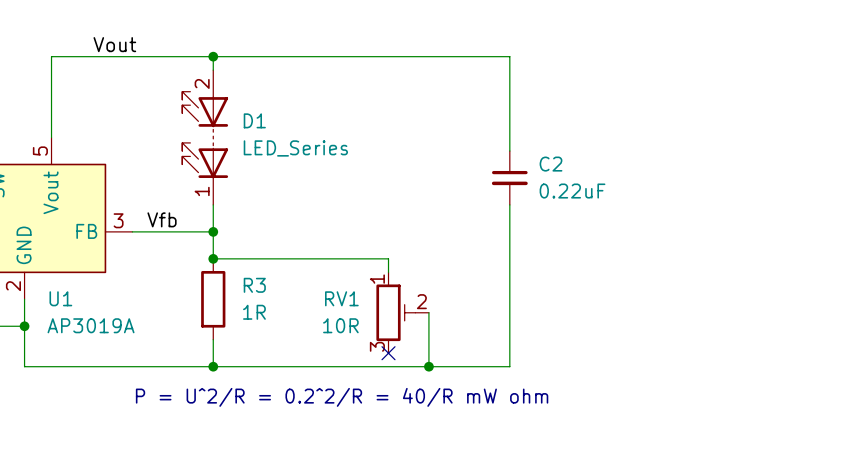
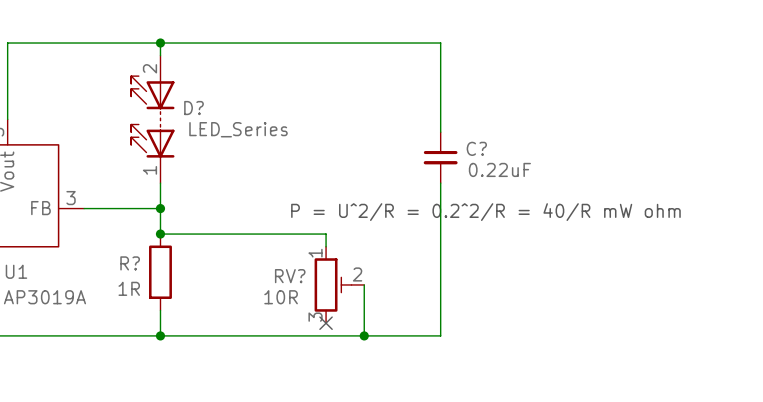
label: Vout (114, 44) -> none
D1 name: D1 (254, 120) -> D? (193, 108)
C2 name: C2 (551, 164) -> C? (476, 148)
label: Vfb (162, 219) -> none
text: none -> P = U^2/R = 0.2^2/R = 40/R mW ohm (485, 212)
R3 name: R3 (254, 285) -> R? (130, 263)
RV1 name: RV1 (341, 298) -> RV? (290, 276)
R3 value position: 1R (254, 312) -> 1R (129, 288)
text: P = U^2/R = 0.2^2/R = 40/R mW ohm (342, 397) -> none

